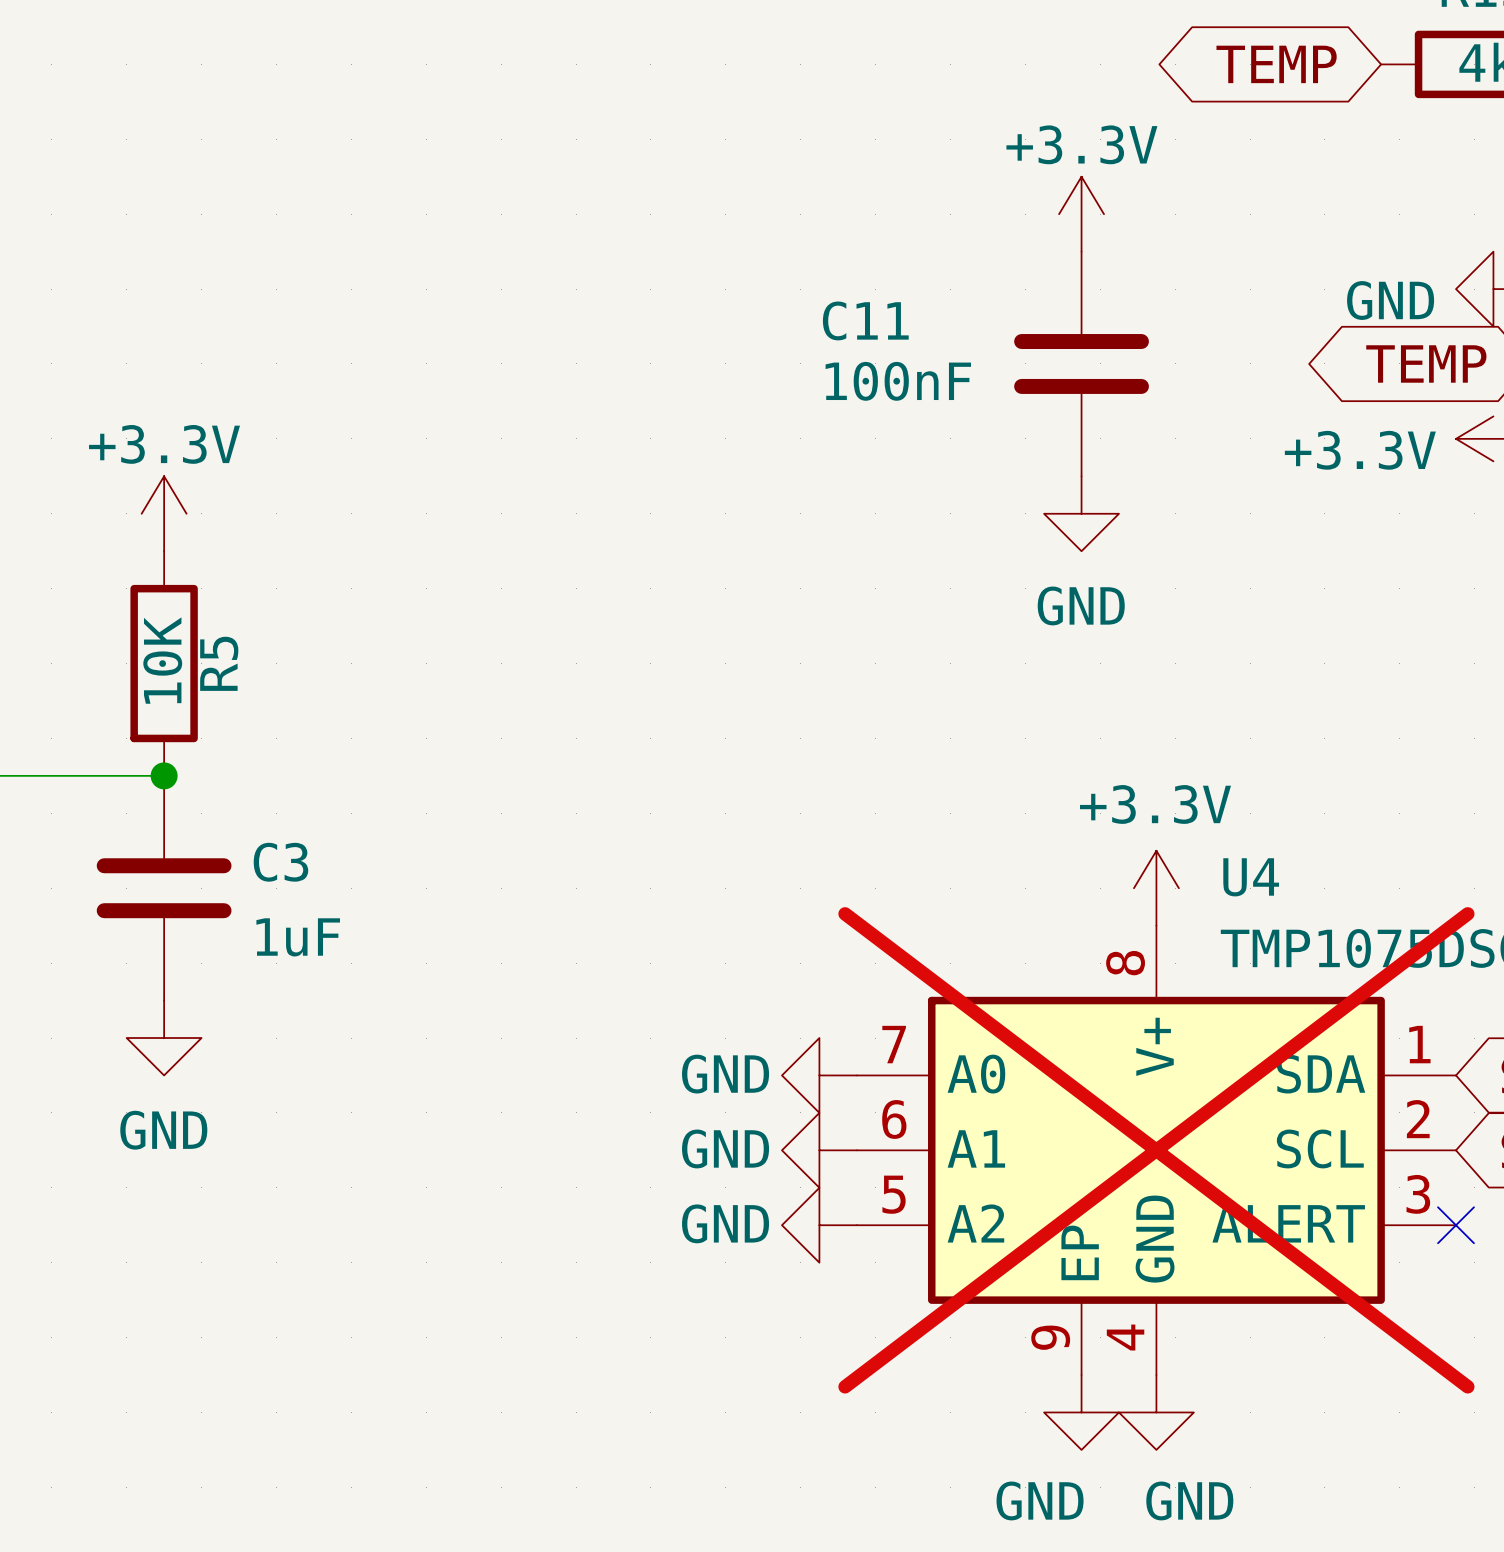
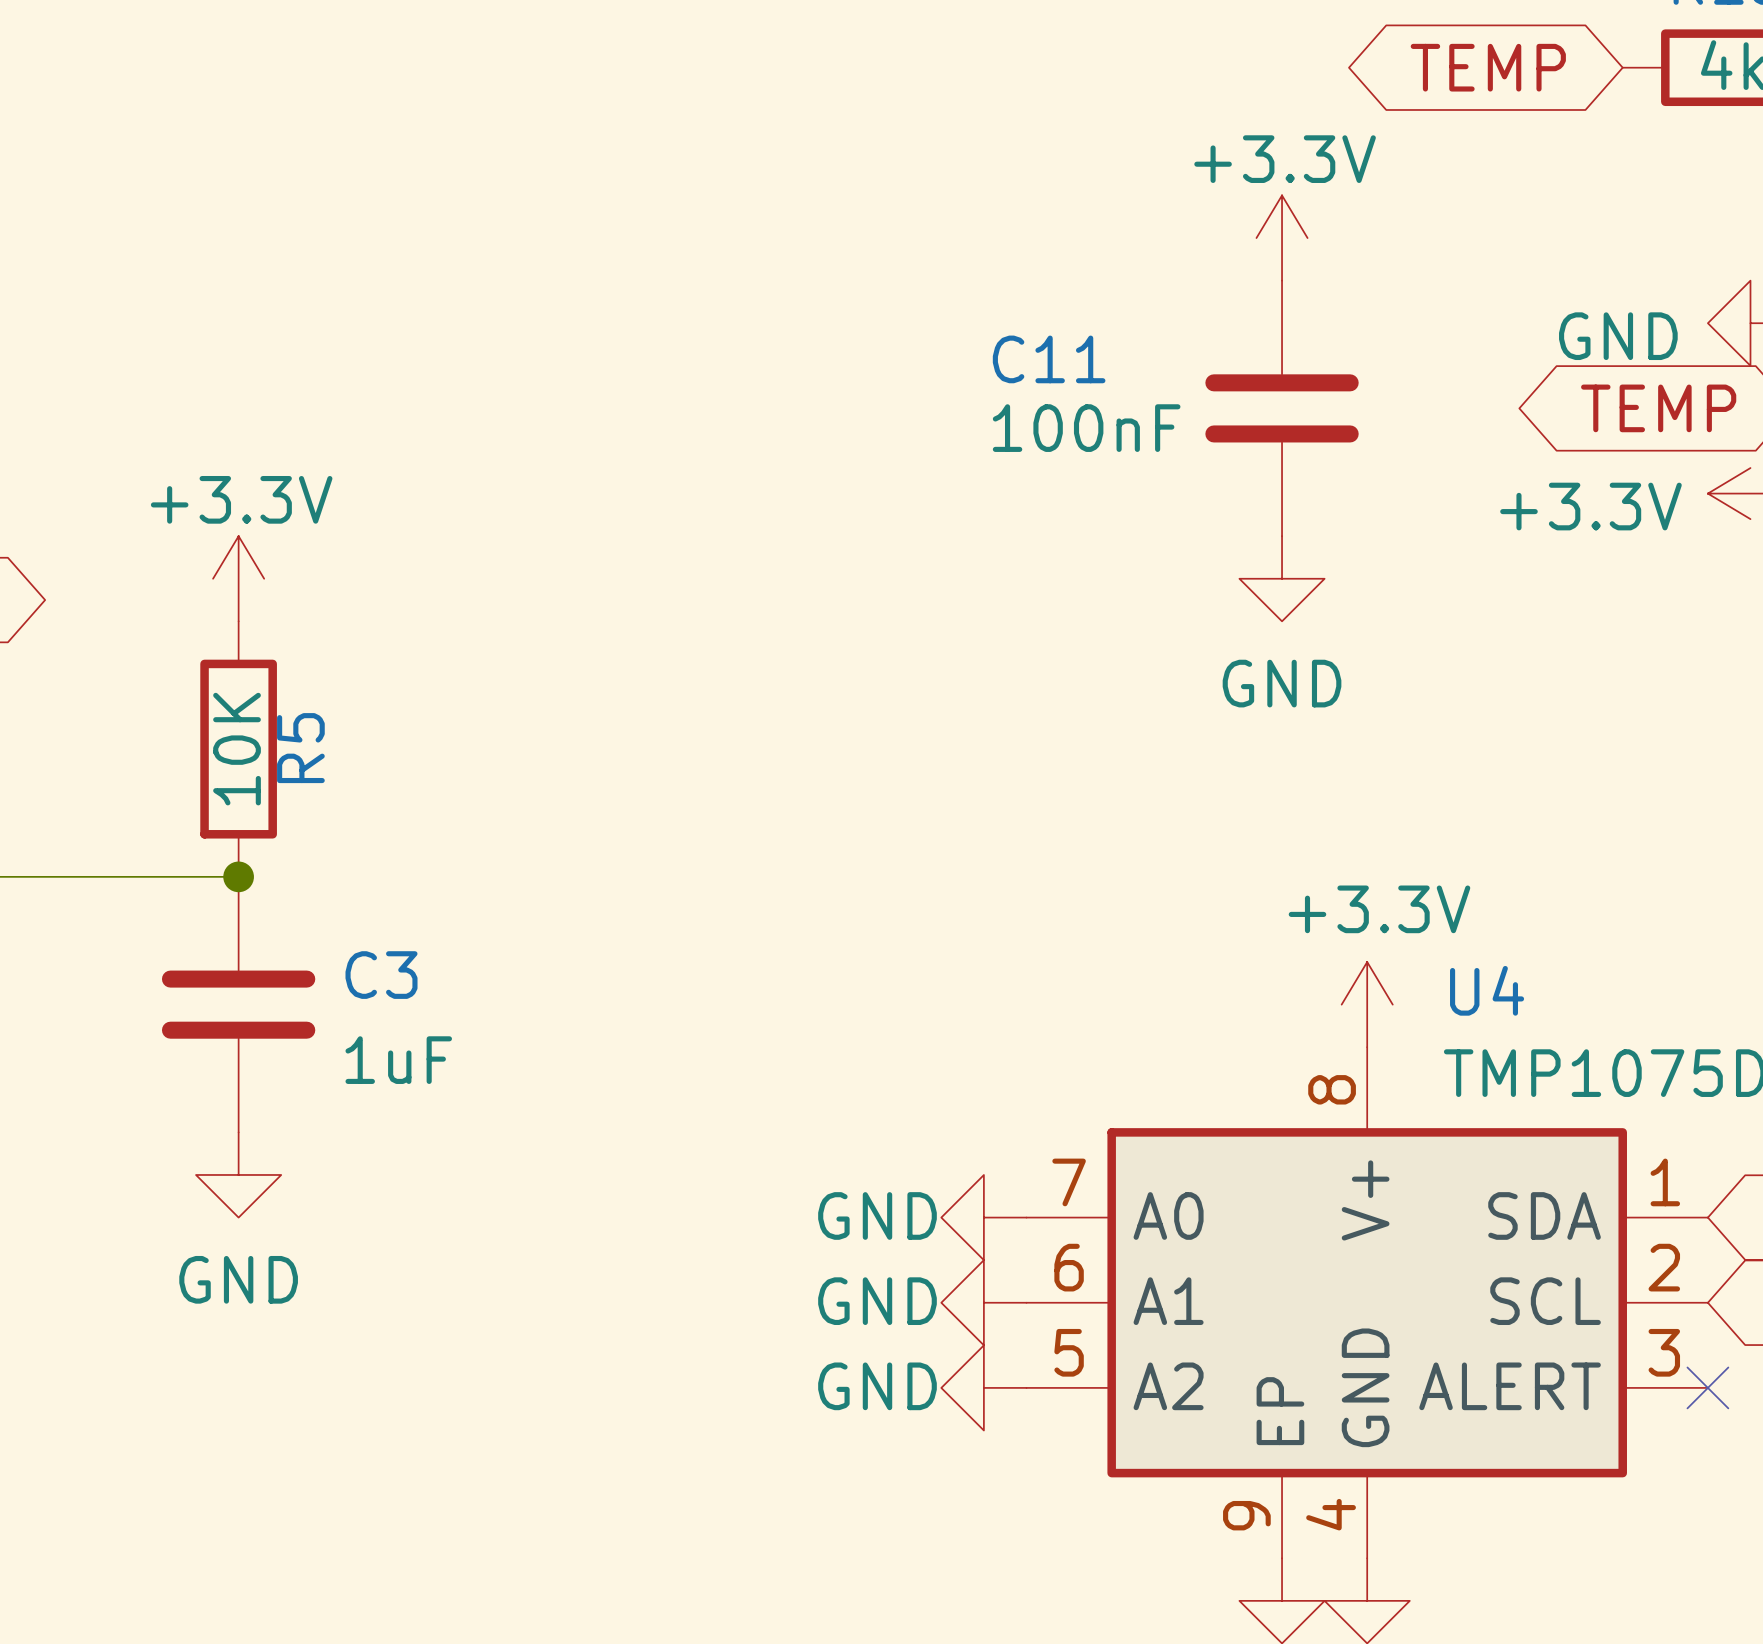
U4 do-not-place cross: (1156, 1150) -> none

